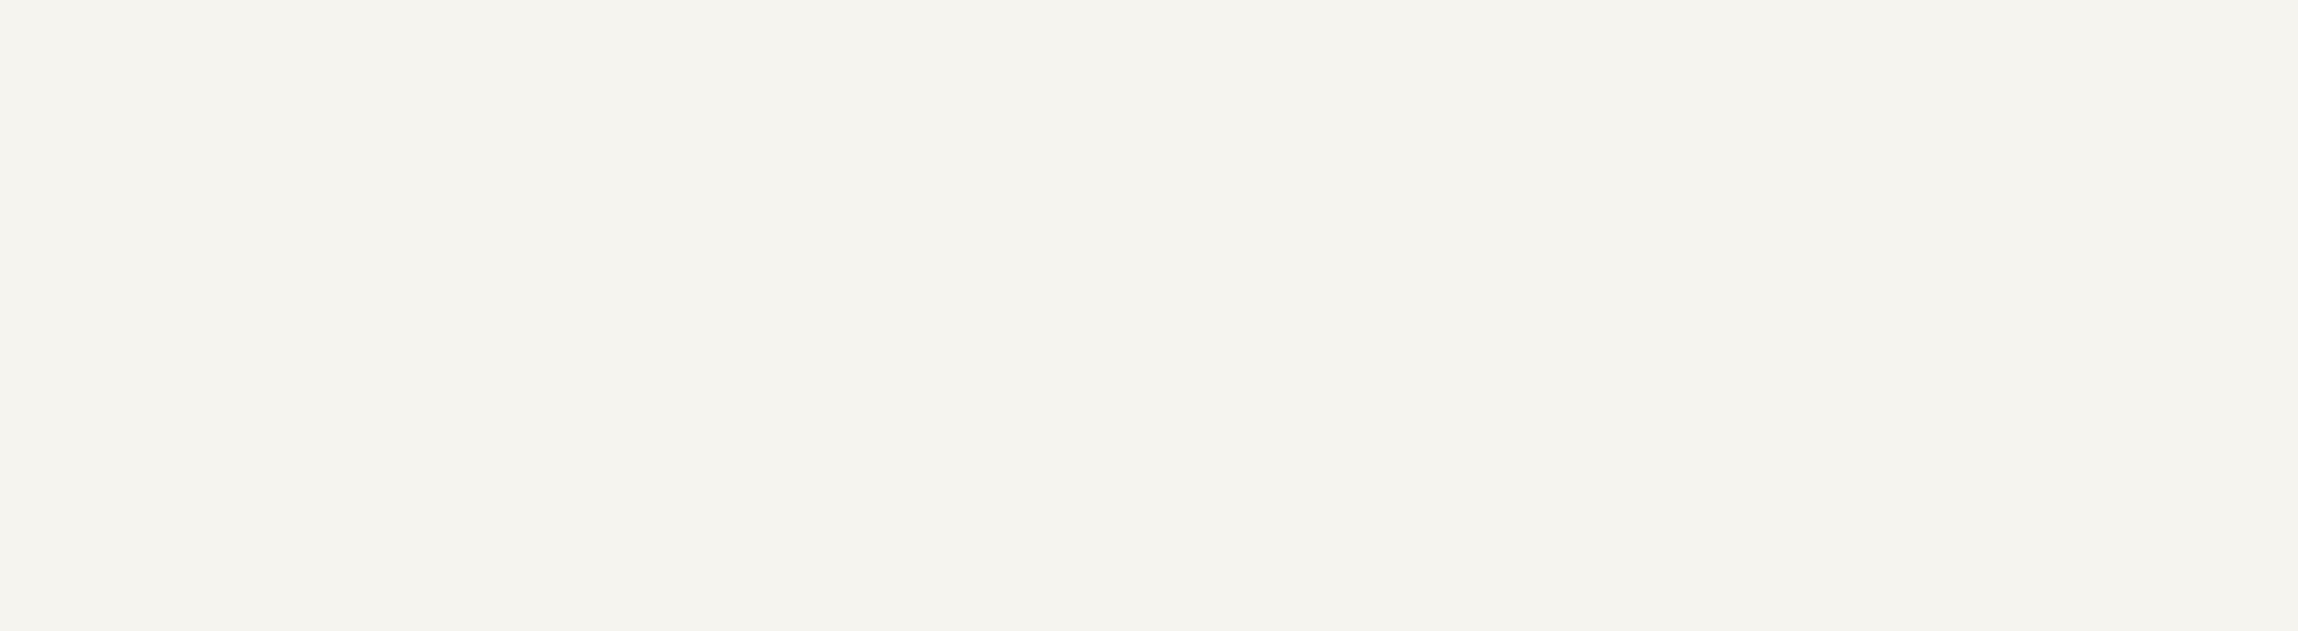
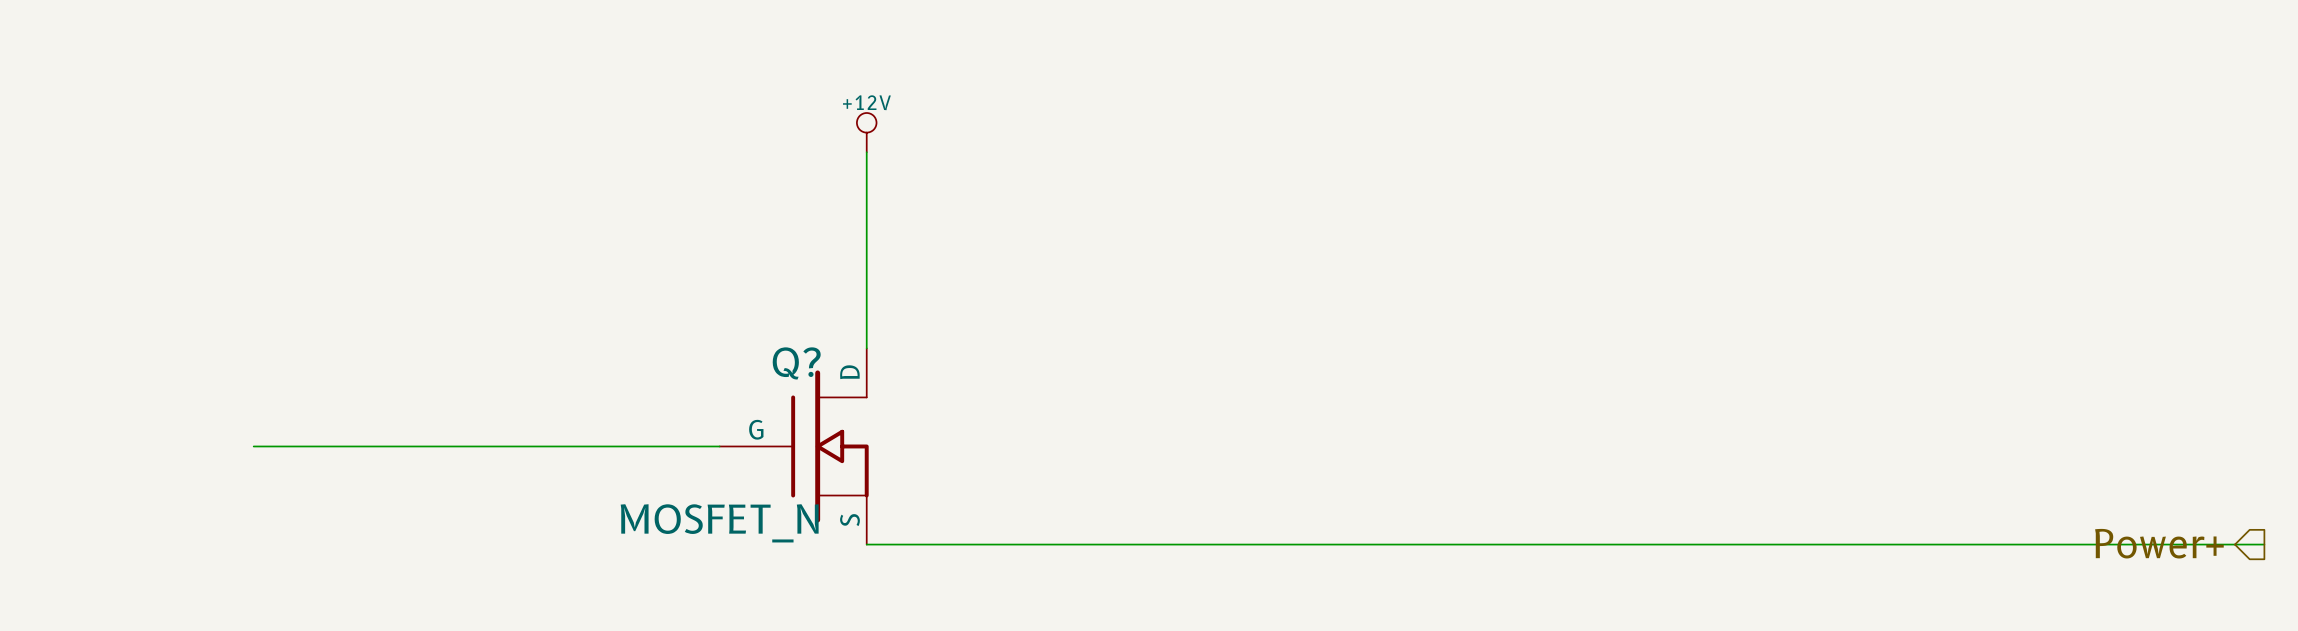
power symbol: none -> +12V (866, 132)
wire: none -> (866, 152) (866, 348)
wire: none -> (253, 446) (719, 446)
Q?: none -> MOSFET_N (794, 446)
hierarchical label: none -> Power+ (2159, 543)
wire: none -> (866, 544) (2264, 544)

